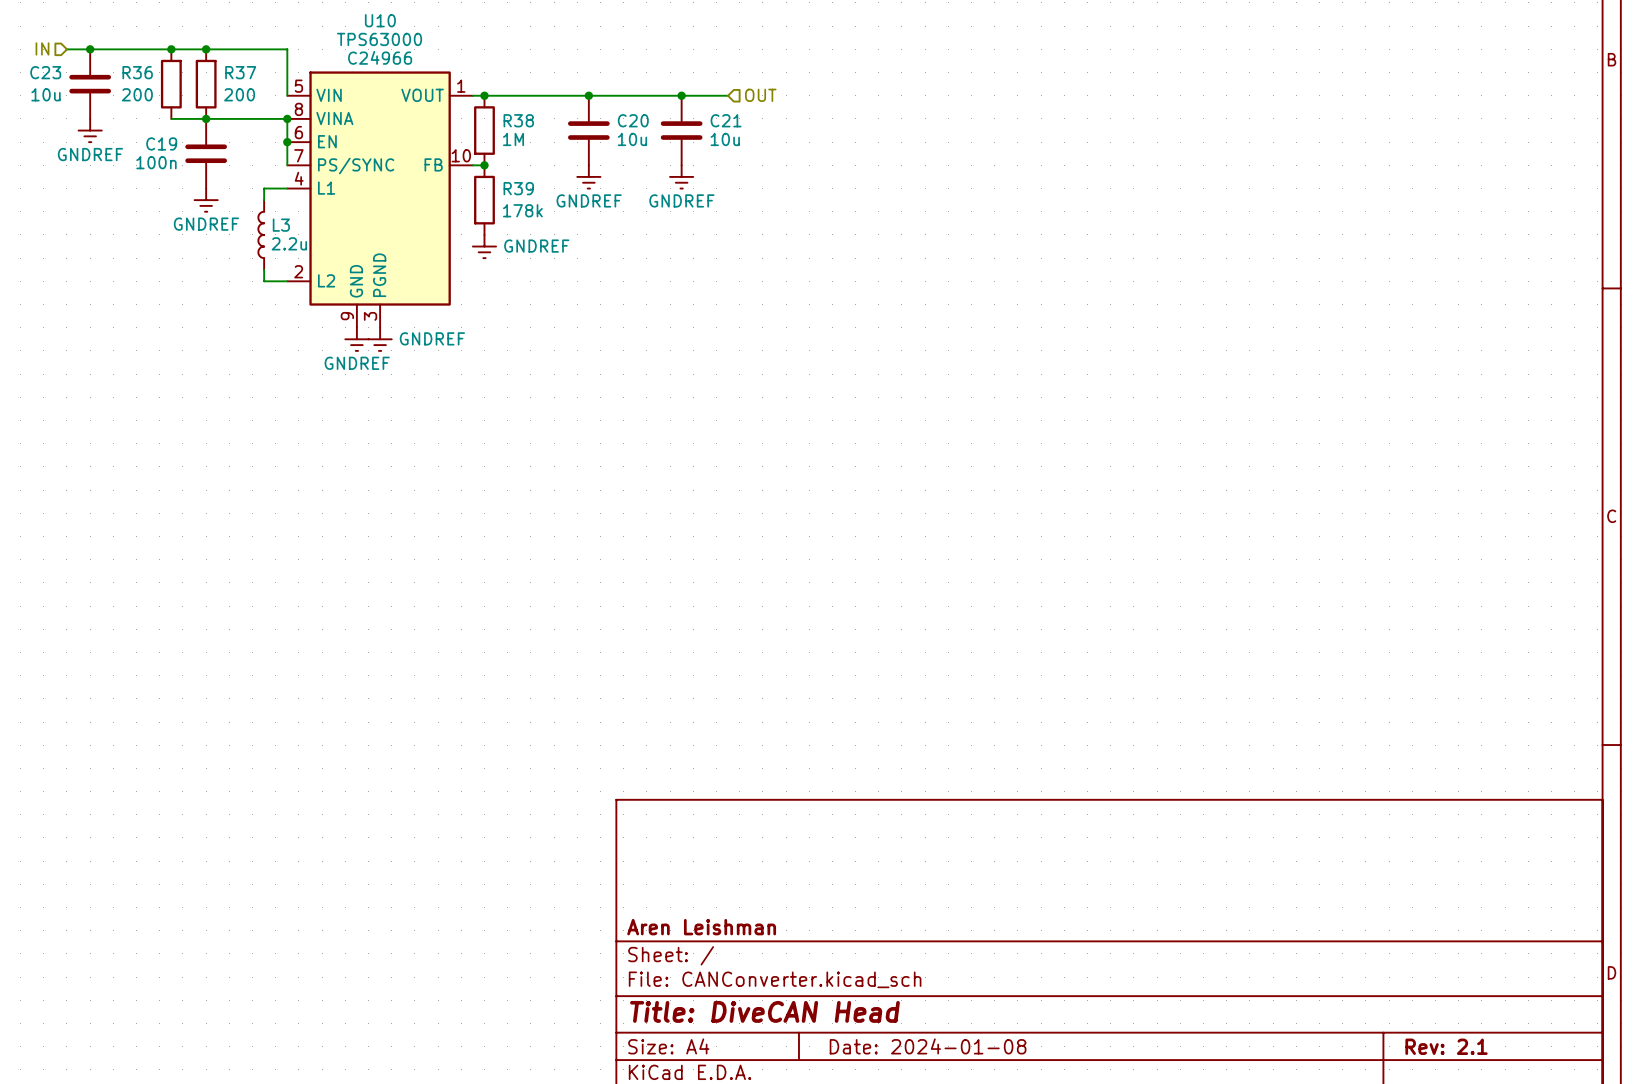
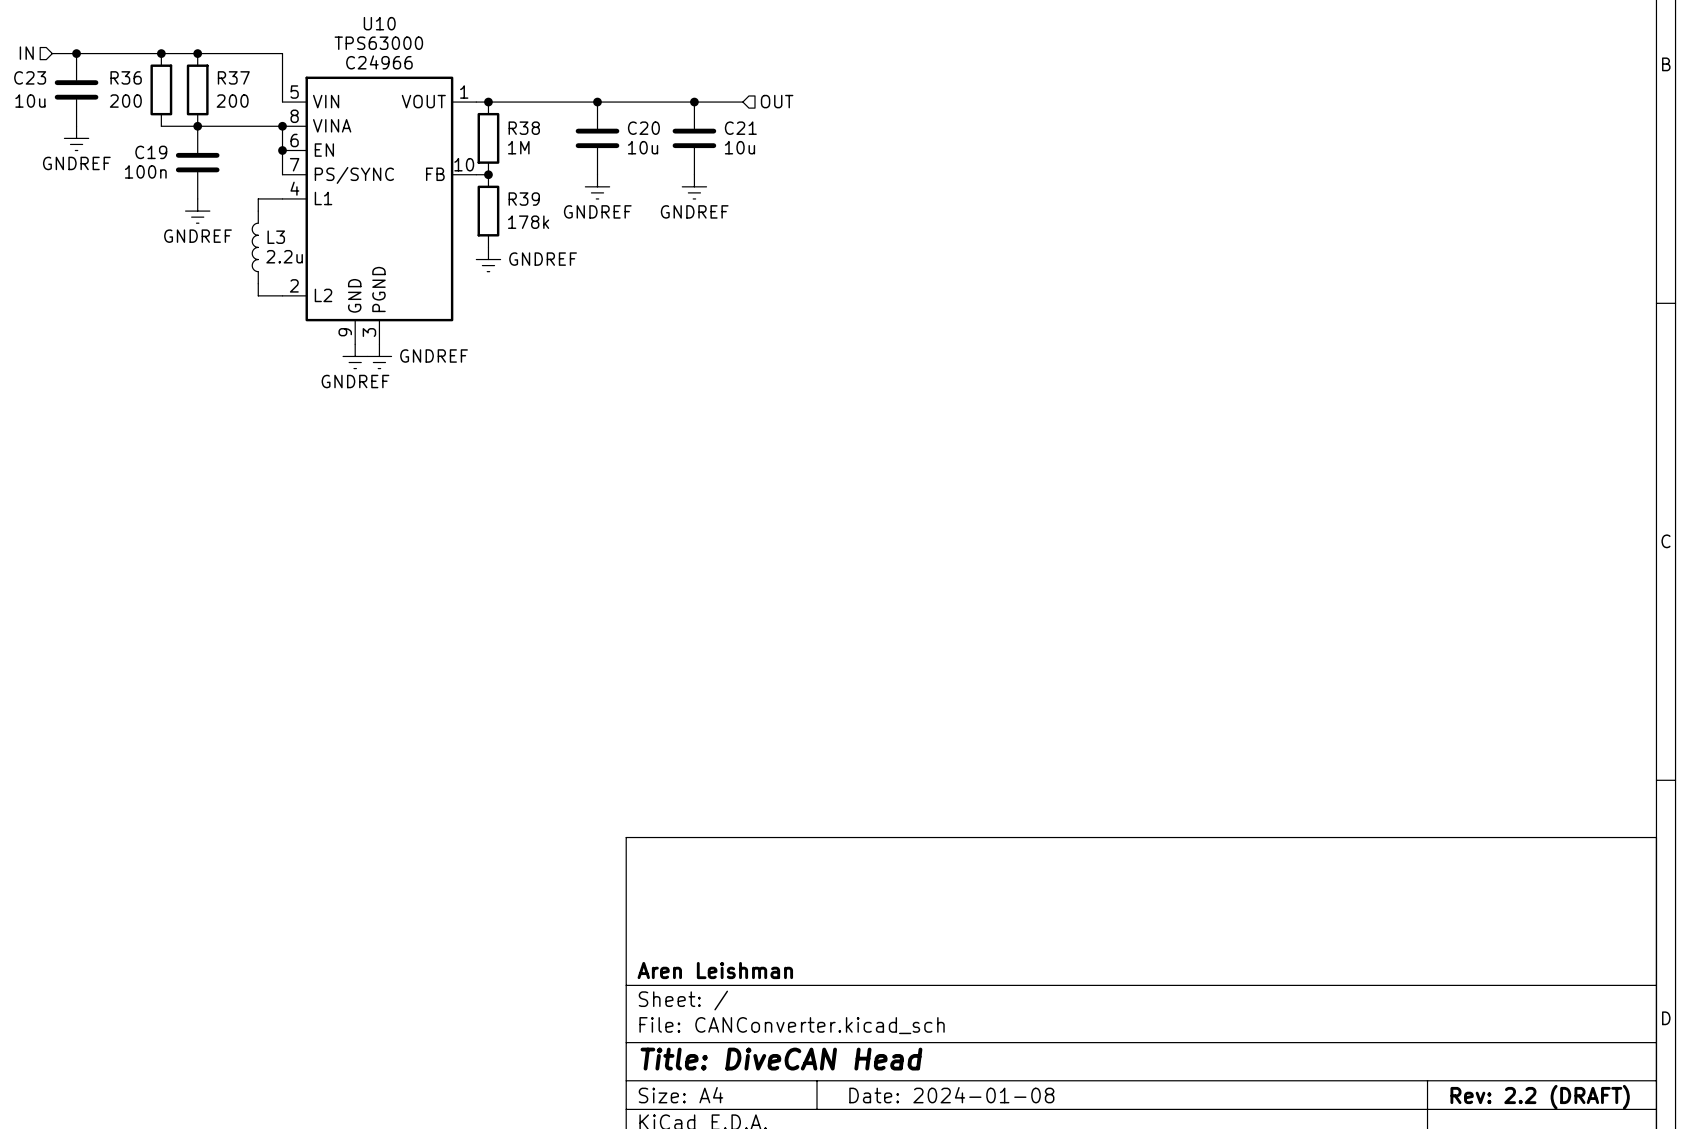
title block: Rev: 2.1 (1446, 1046) -> Rev: 2.2 (DRAFT) (1540, 1097)

